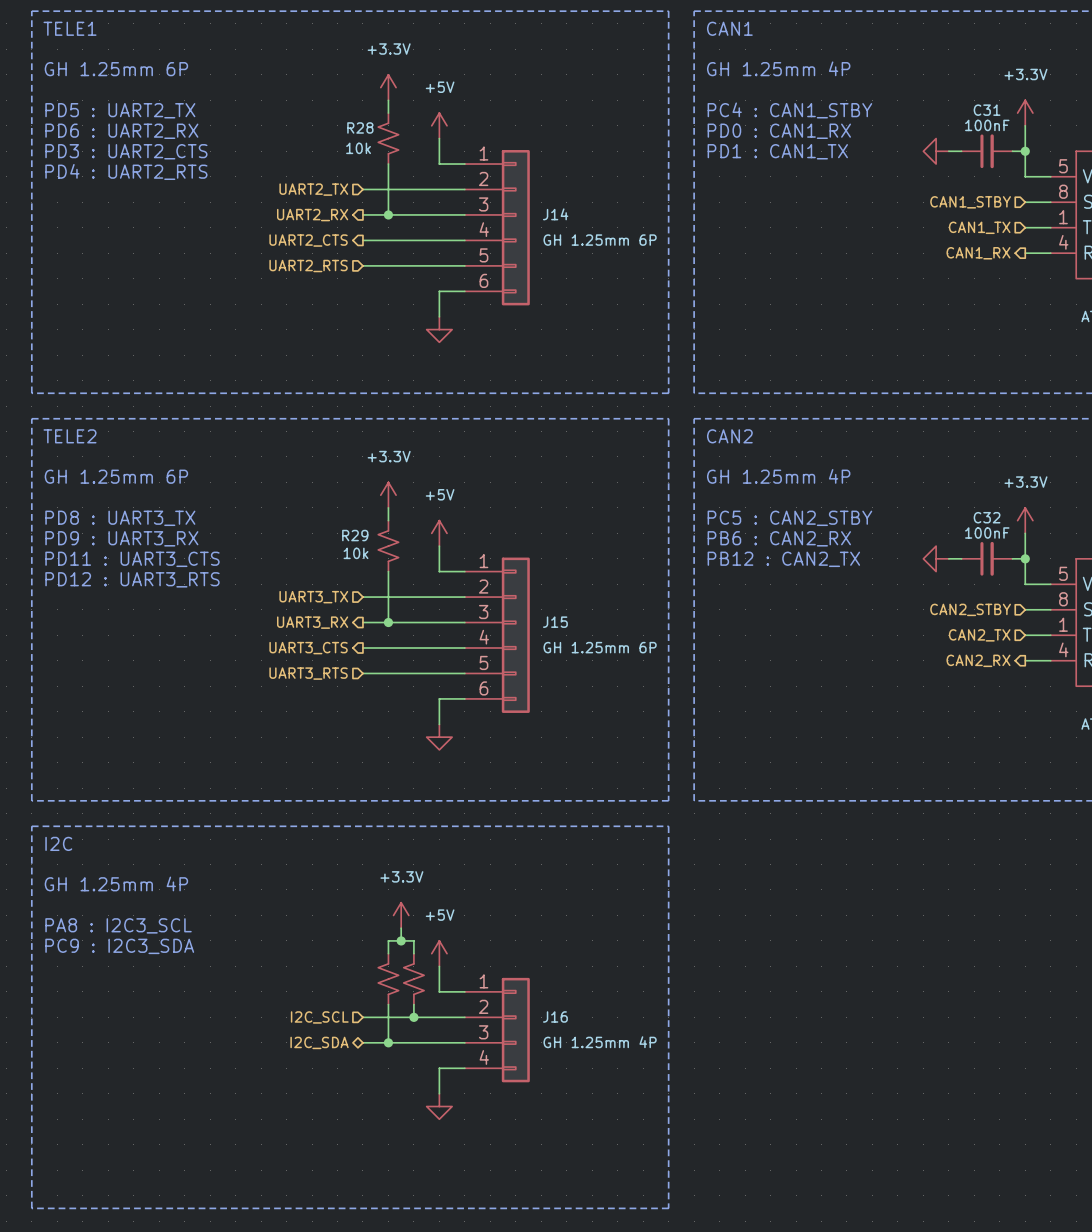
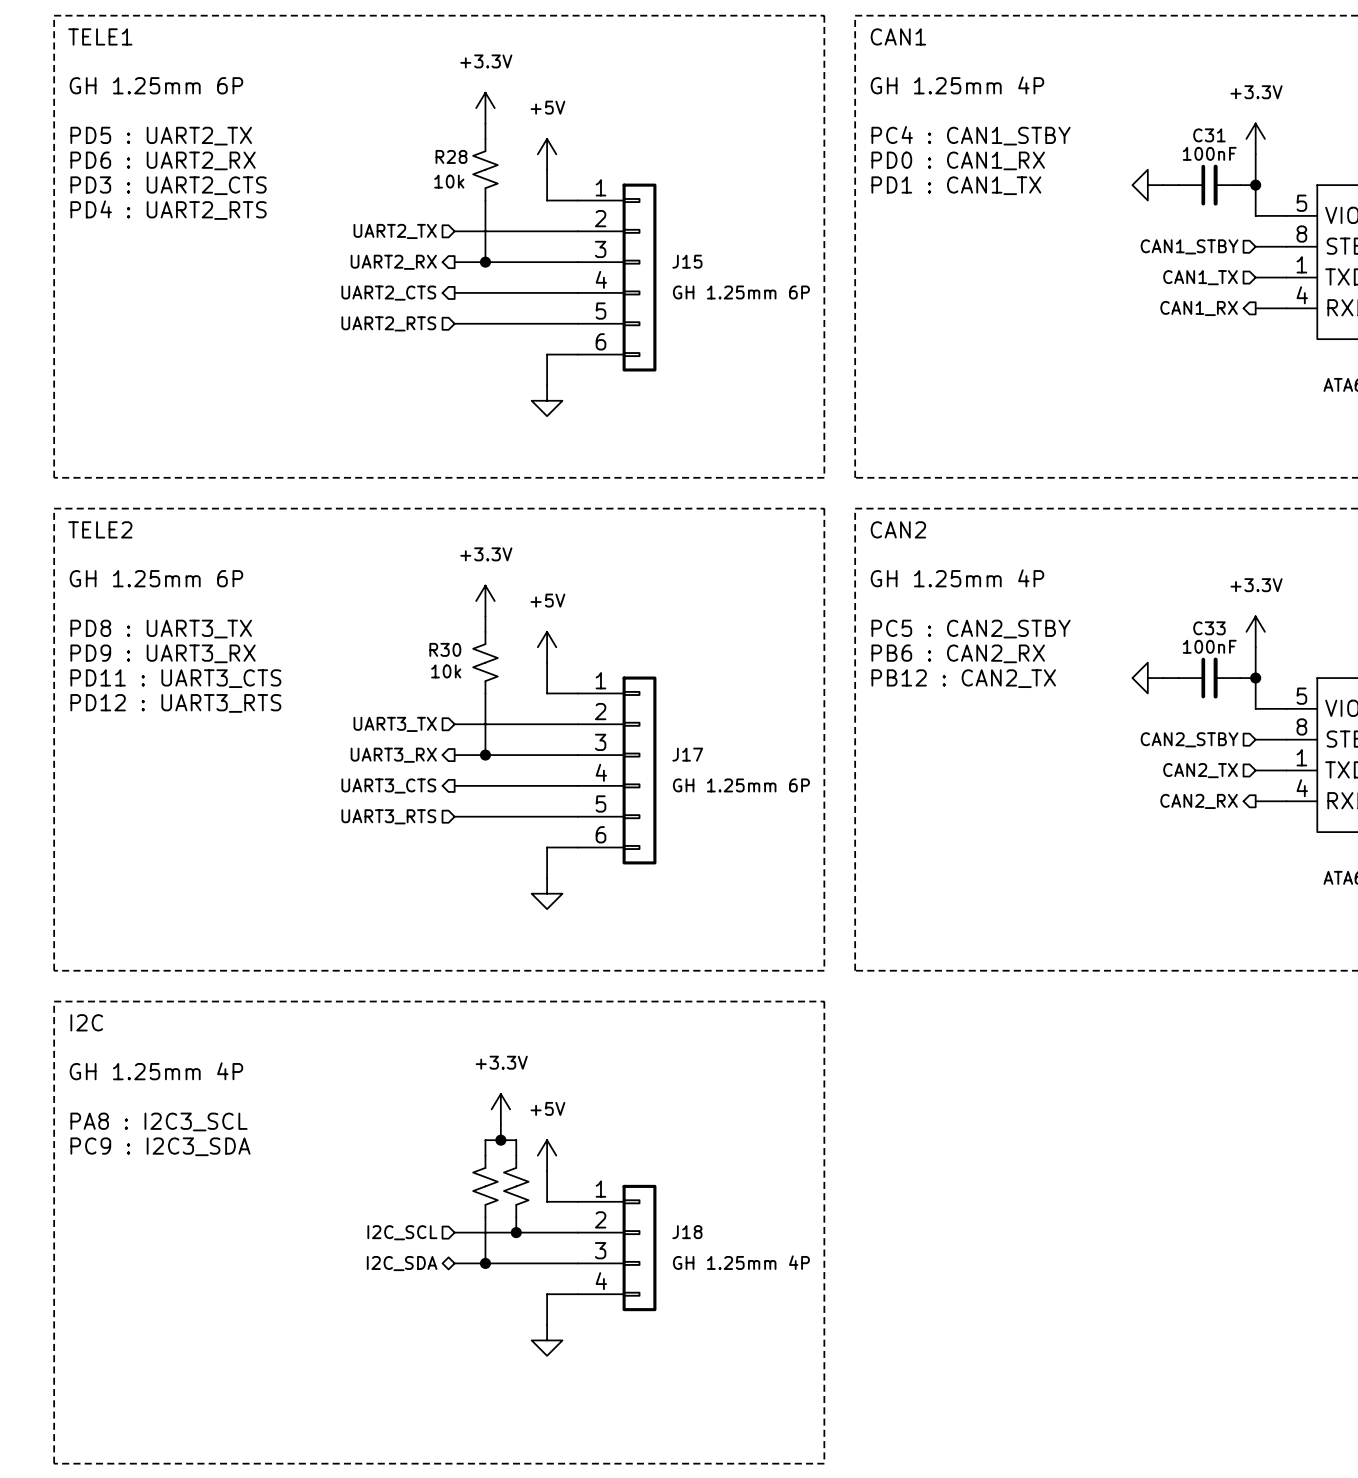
J14 name: J14 (555, 214) -> J15 (687, 261)
C32 name: C32 (987, 517) -> C33 (1209, 628)
R29 name: R29 (355, 535) -> R30 (445, 649)
J15 name: J15 (555, 622) -> J17 (687, 754)
J16 name: J16 (555, 1016) -> J18 (687, 1232)

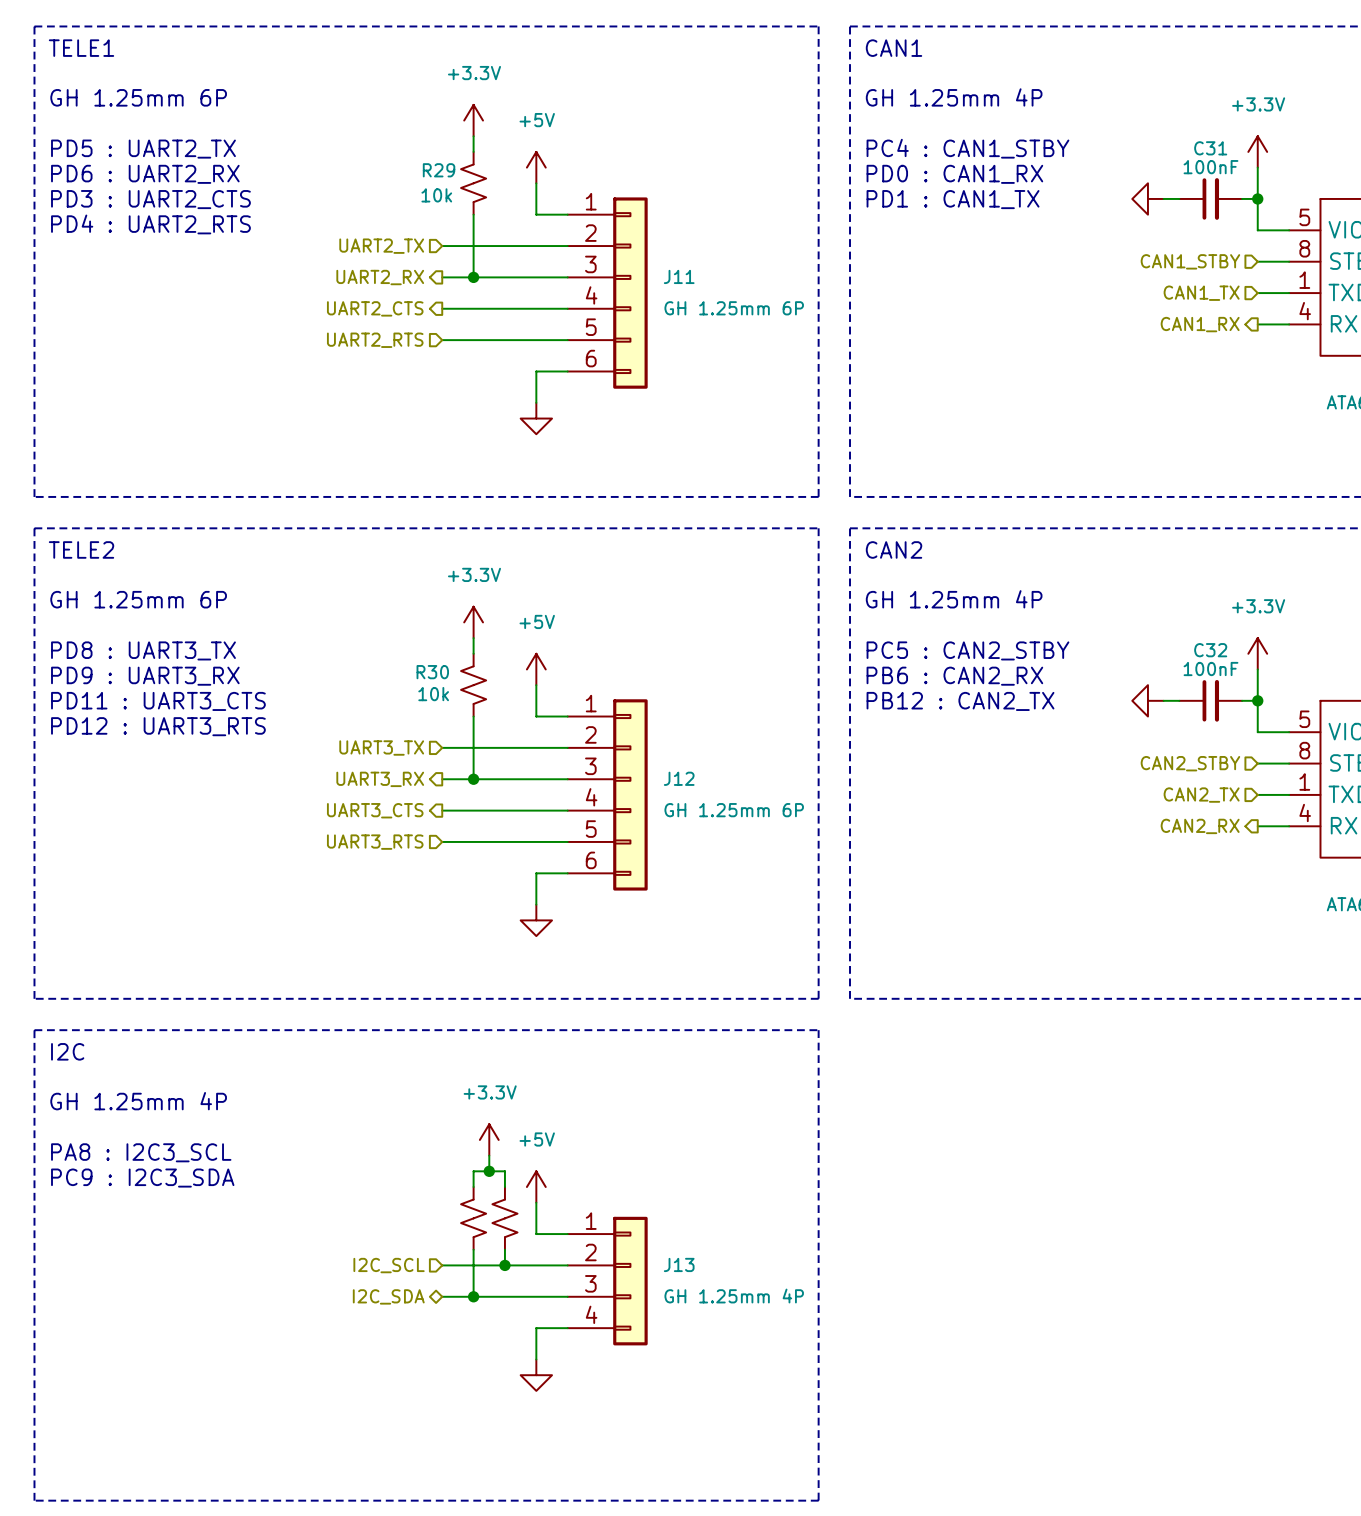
R28 name: R28 (451, 156) -> R29 (439, 170)
J15 name: J15 (687, 261) -> J11 (679, 276)
C33 name: C33 (1209, 628) -> C32 (1210, 650)
J17 name: J17 (687, 754) -> J12 (679, 778)
J18 name: J18 (687, 1232) -> J13 (679, 1264)

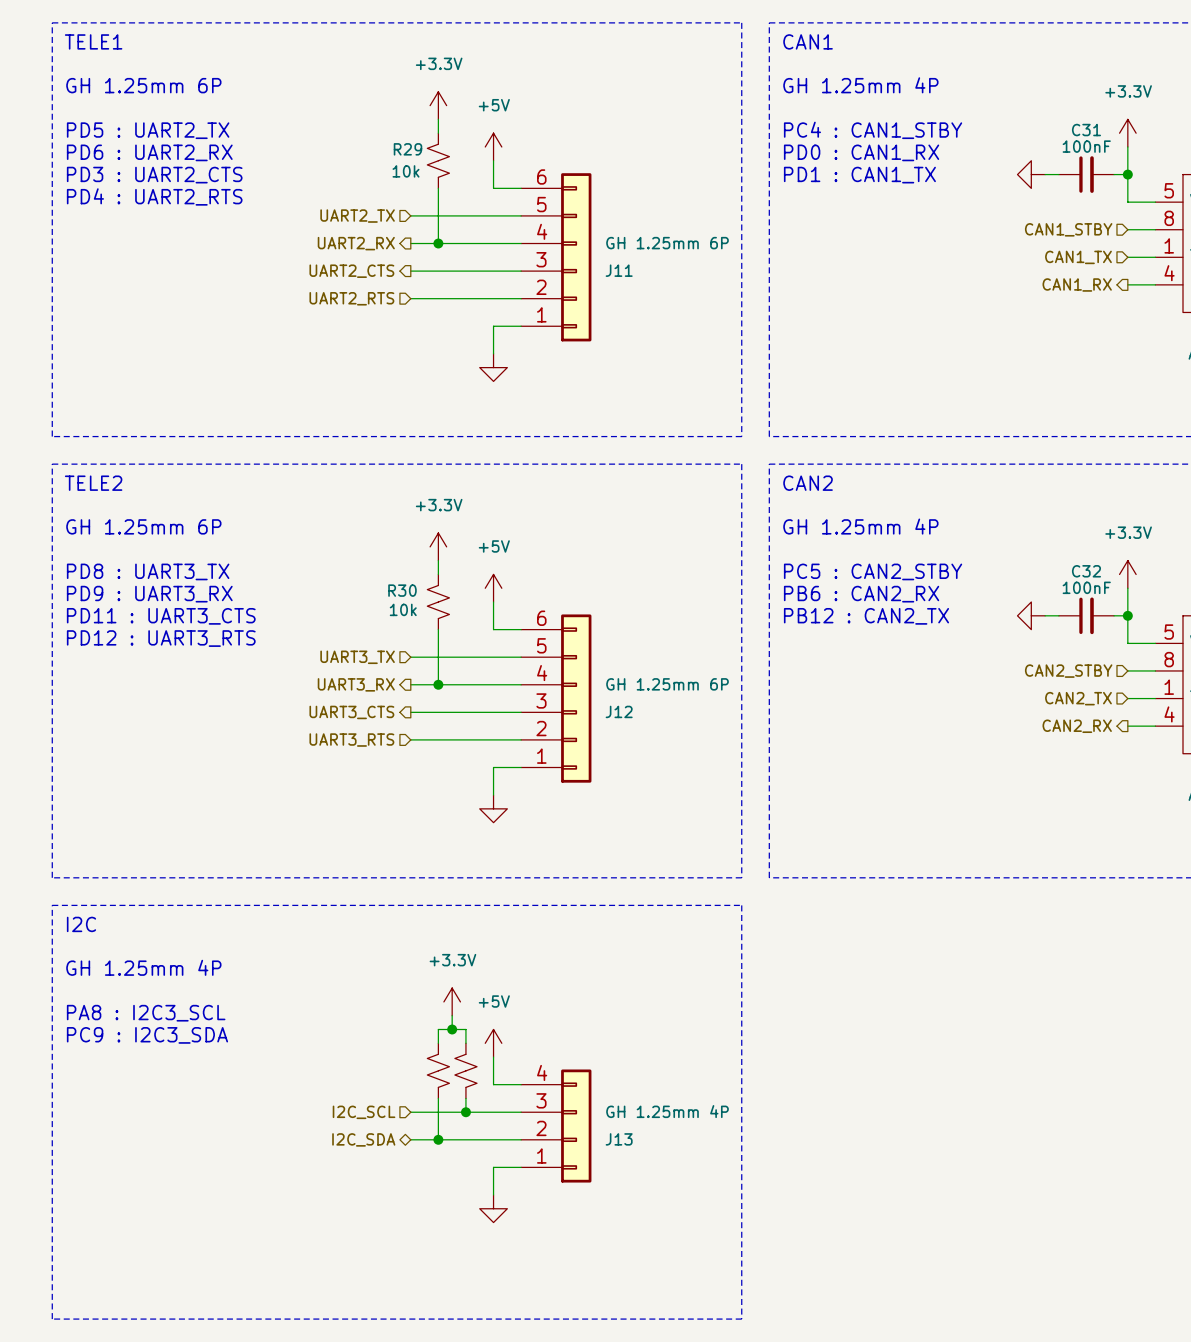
J11 flip: as is (630, 293) -> up-down (576, 257)
J12 flip: as is (630, 794) -> up-down (576, 698)
J13 flip: as is (630, 1281) -> up-down (576, 1126)

